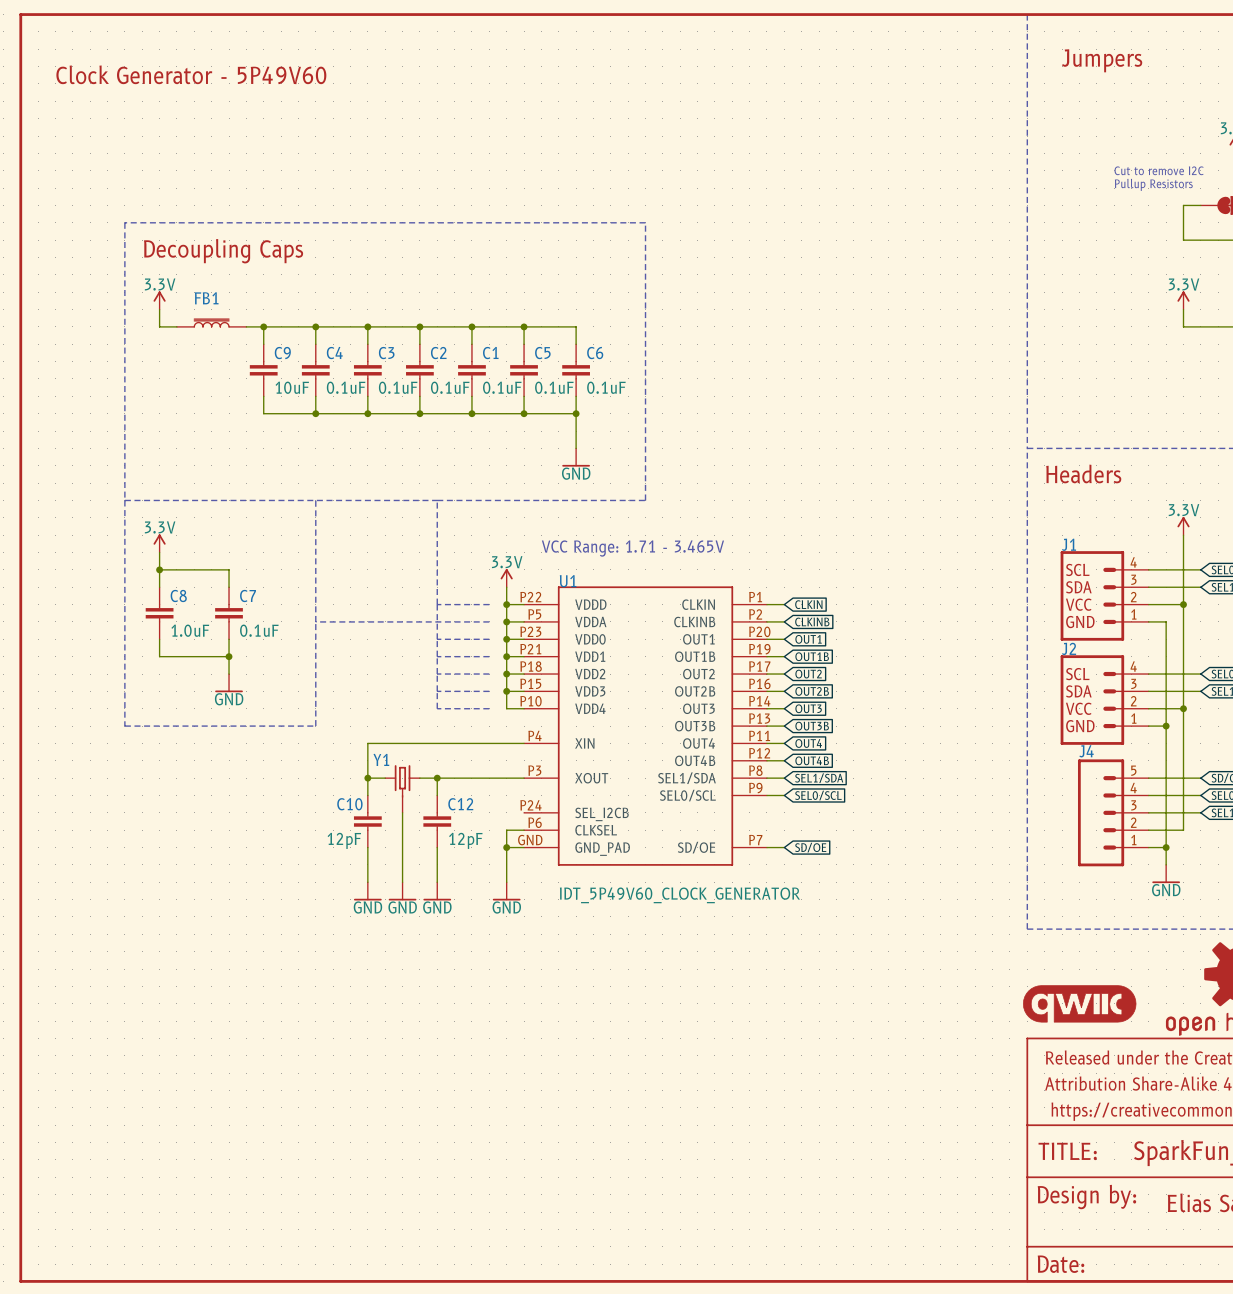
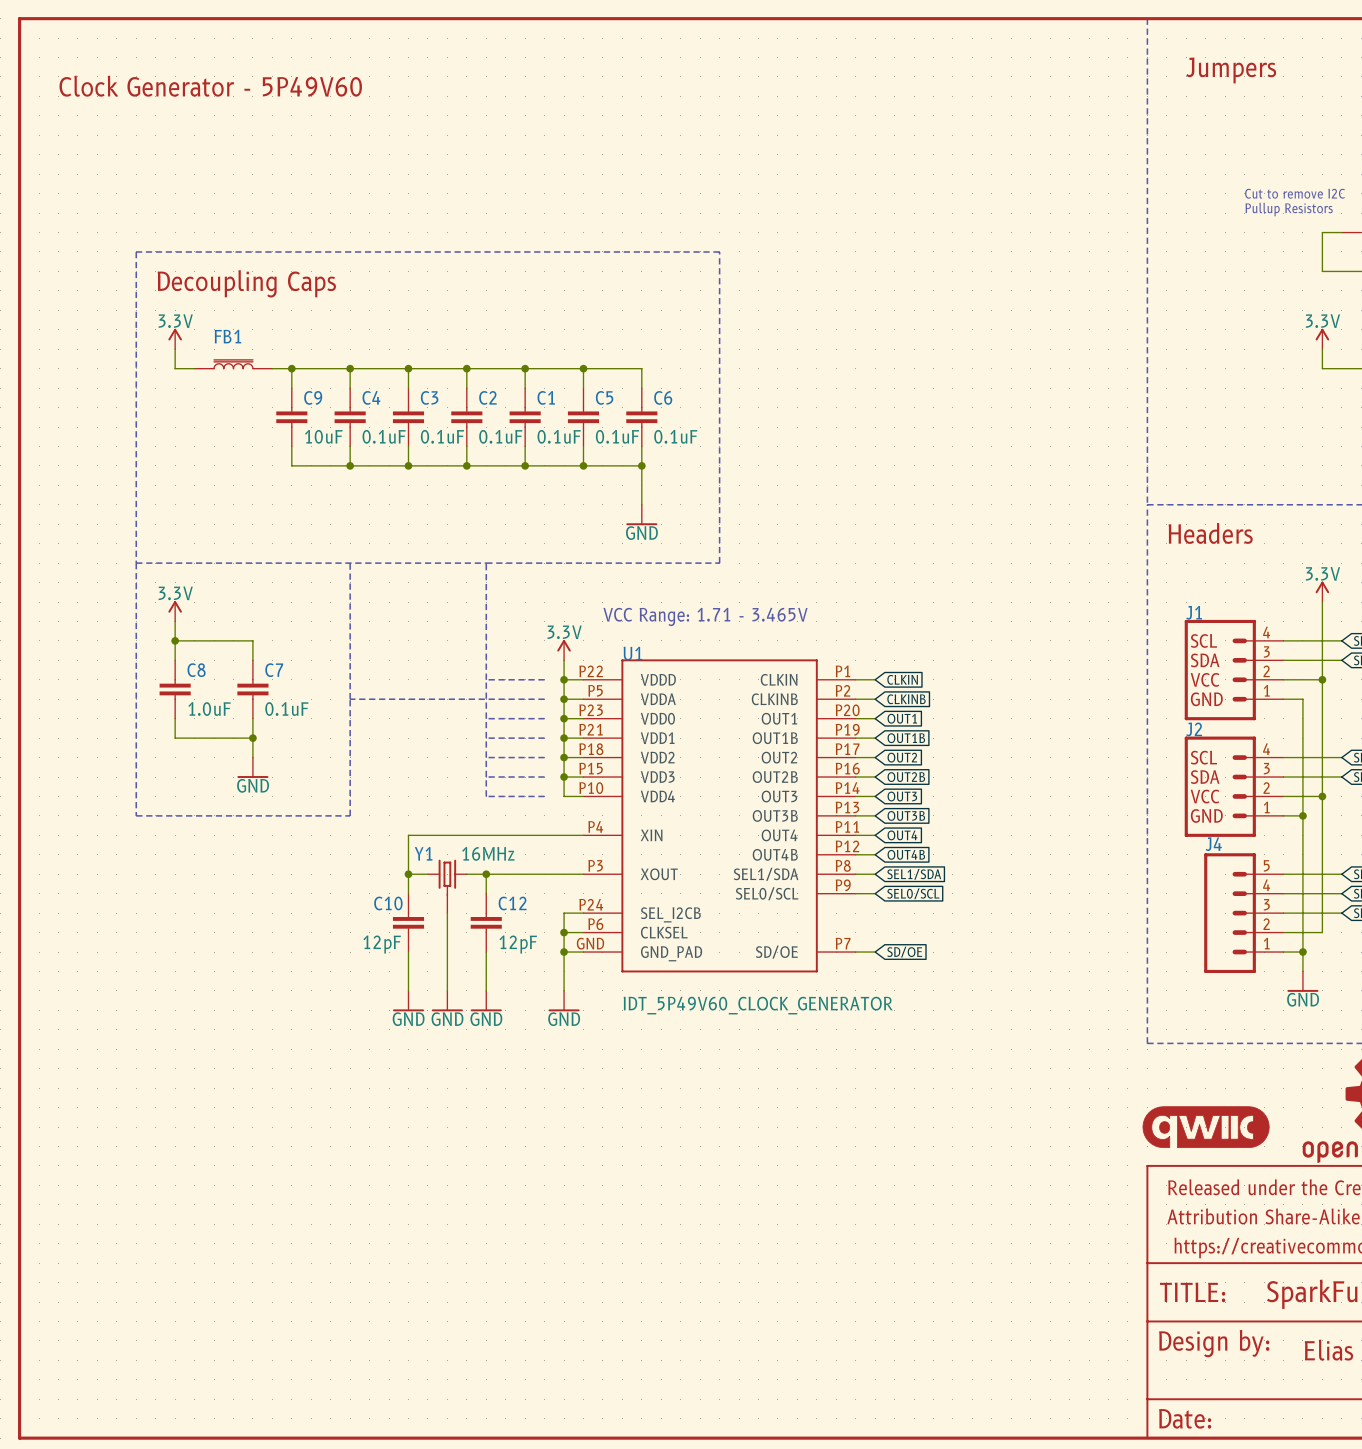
Y1 value: none -> 16MHz (488, 853)
wire: none -> (583, 913) (564, 913) (564, 932)
junction: none -> (564, 932)

